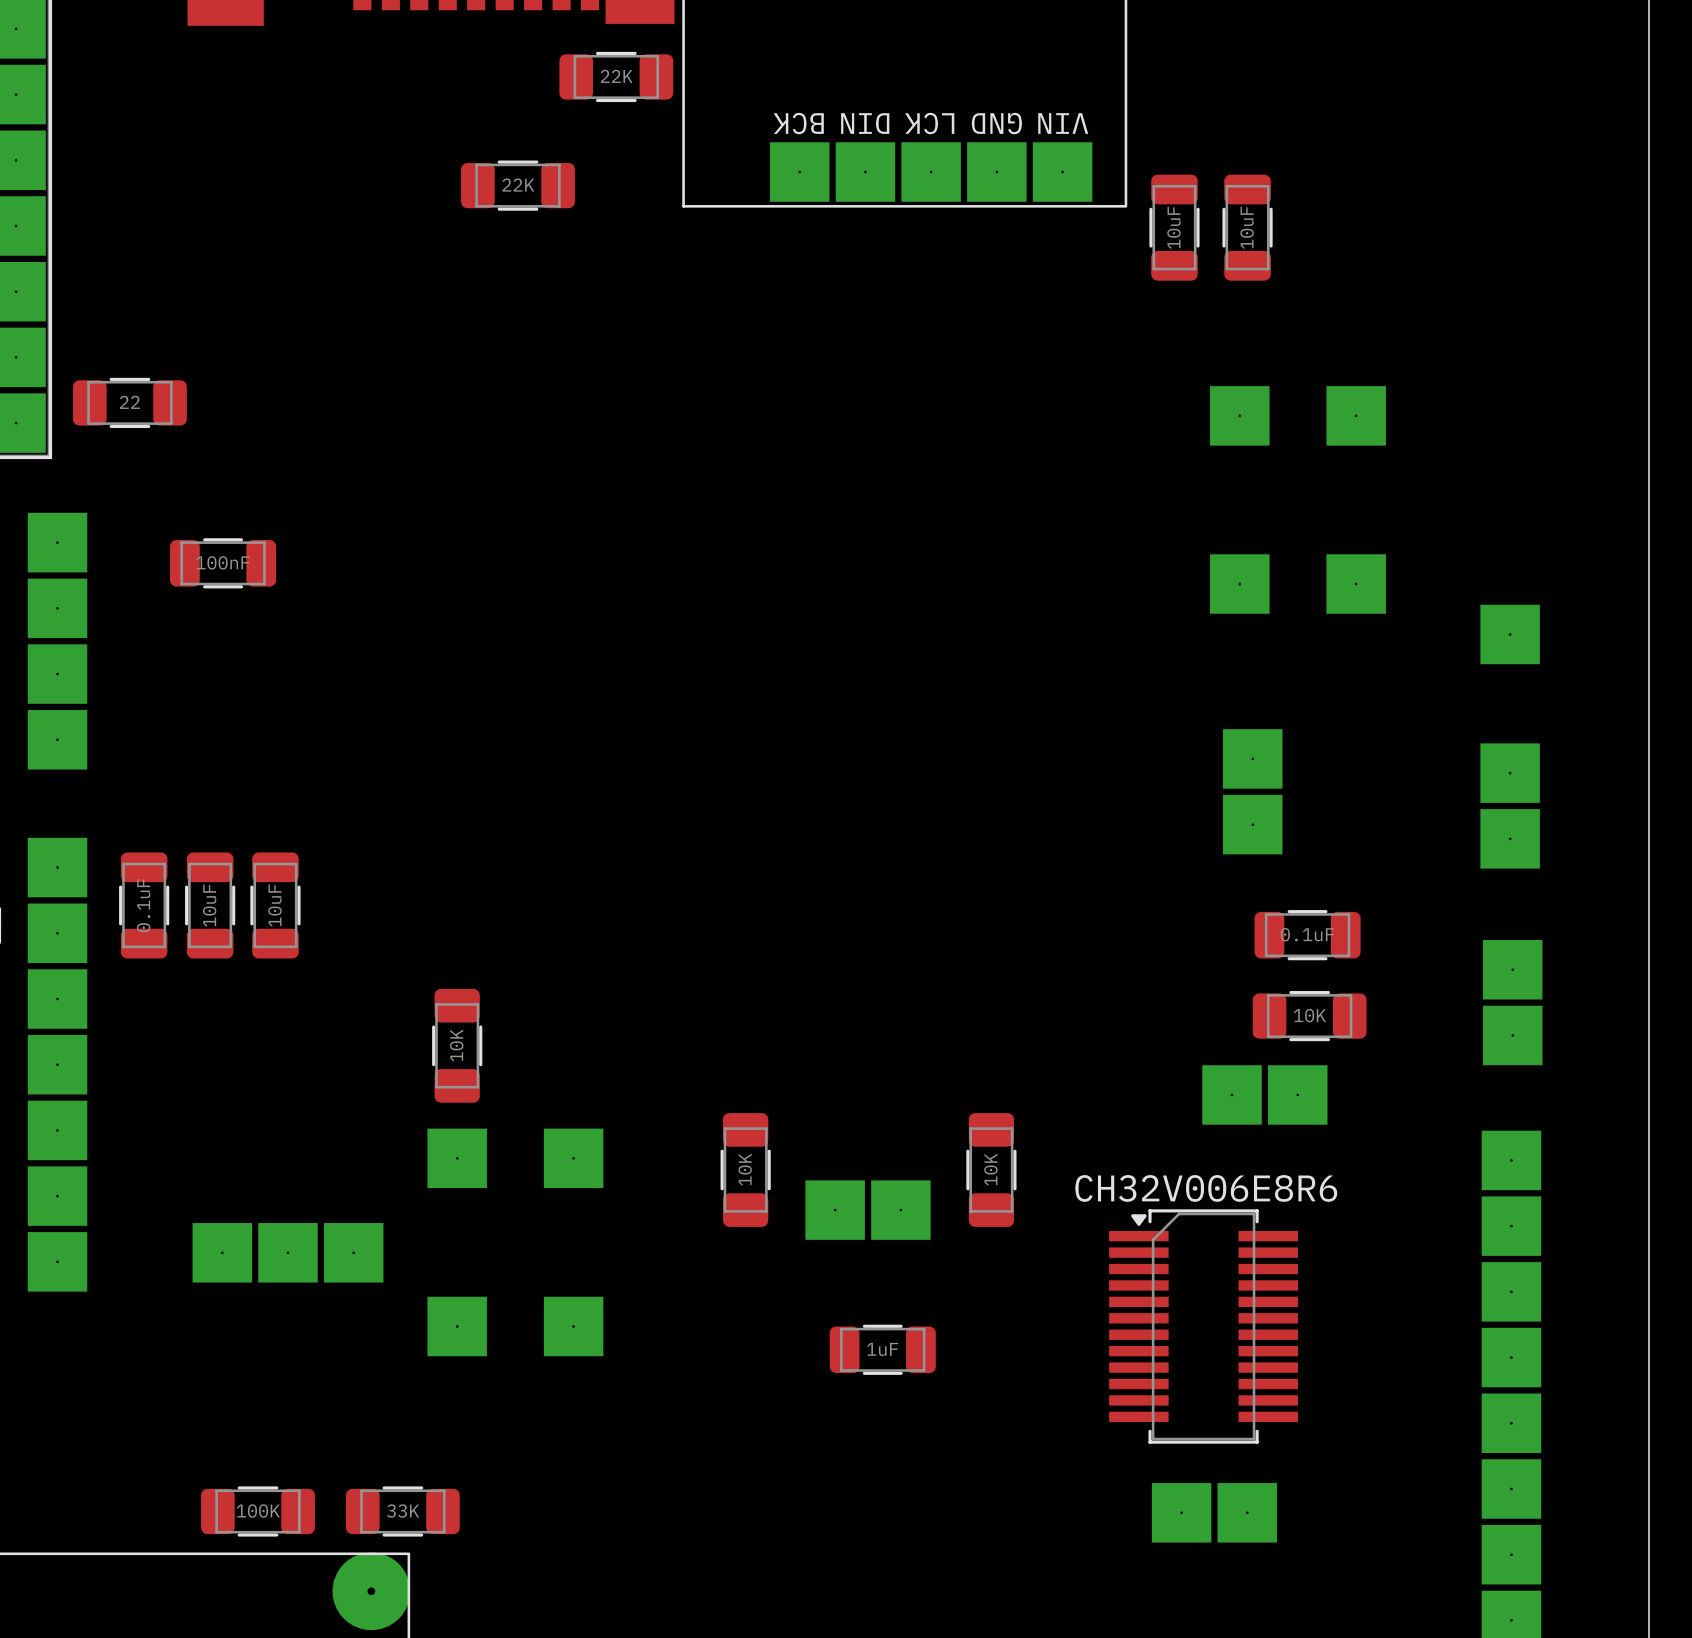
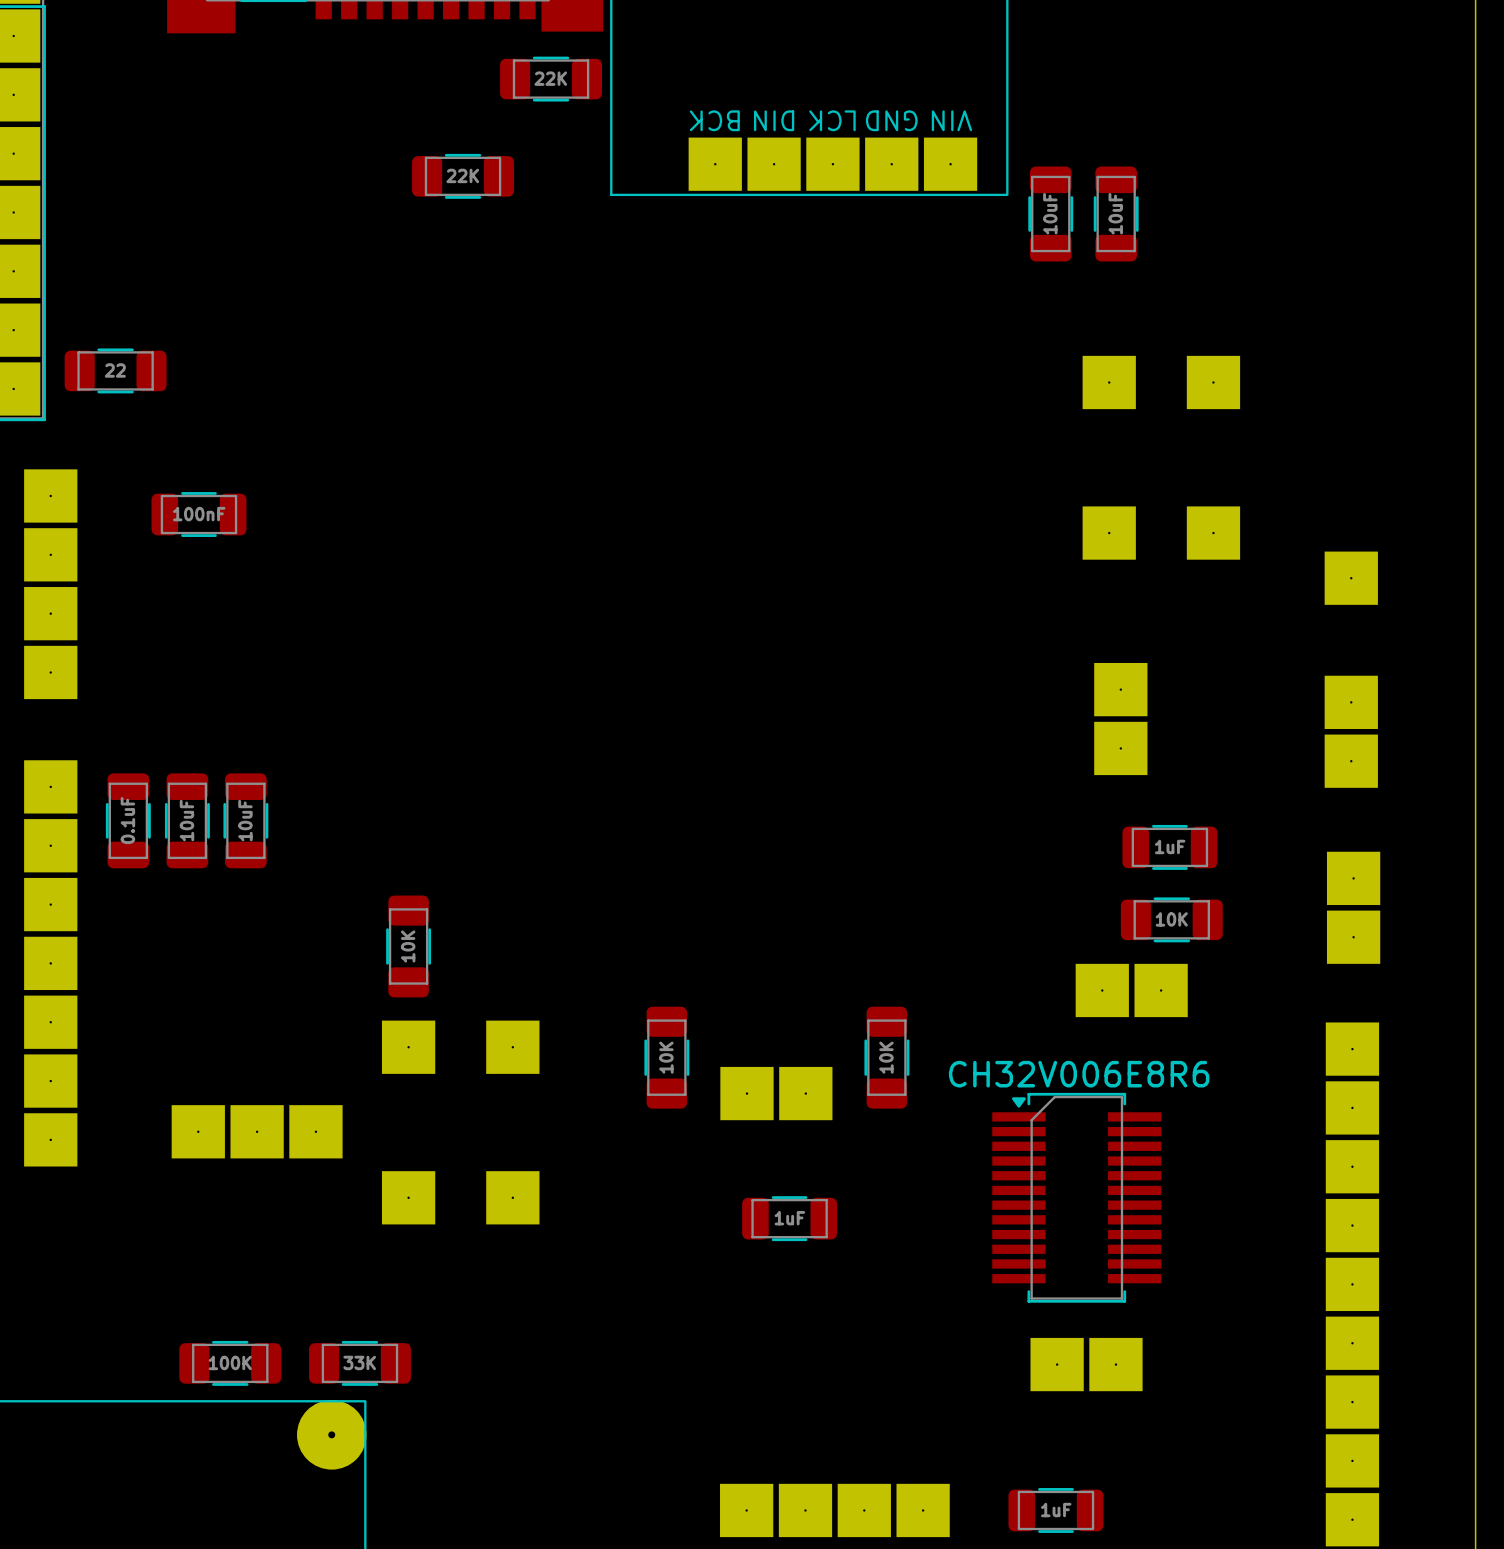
part value: 0.1uF (1307, 934) -> 1uF (1170, 846)

